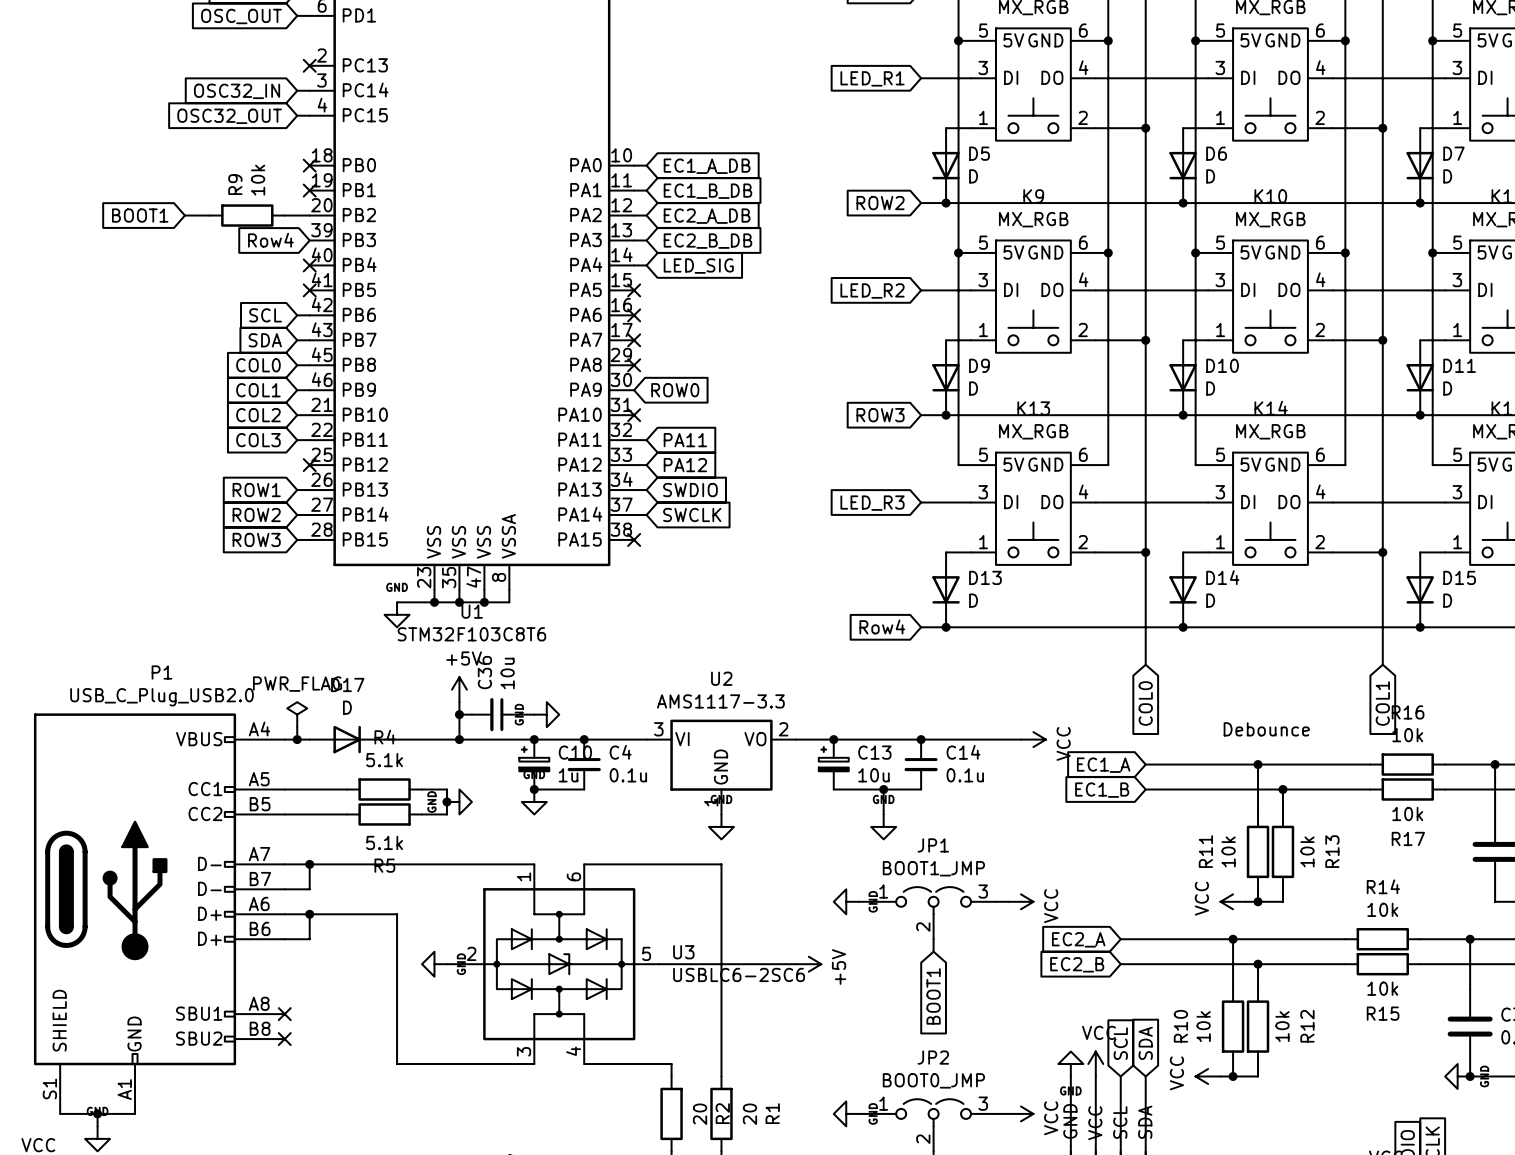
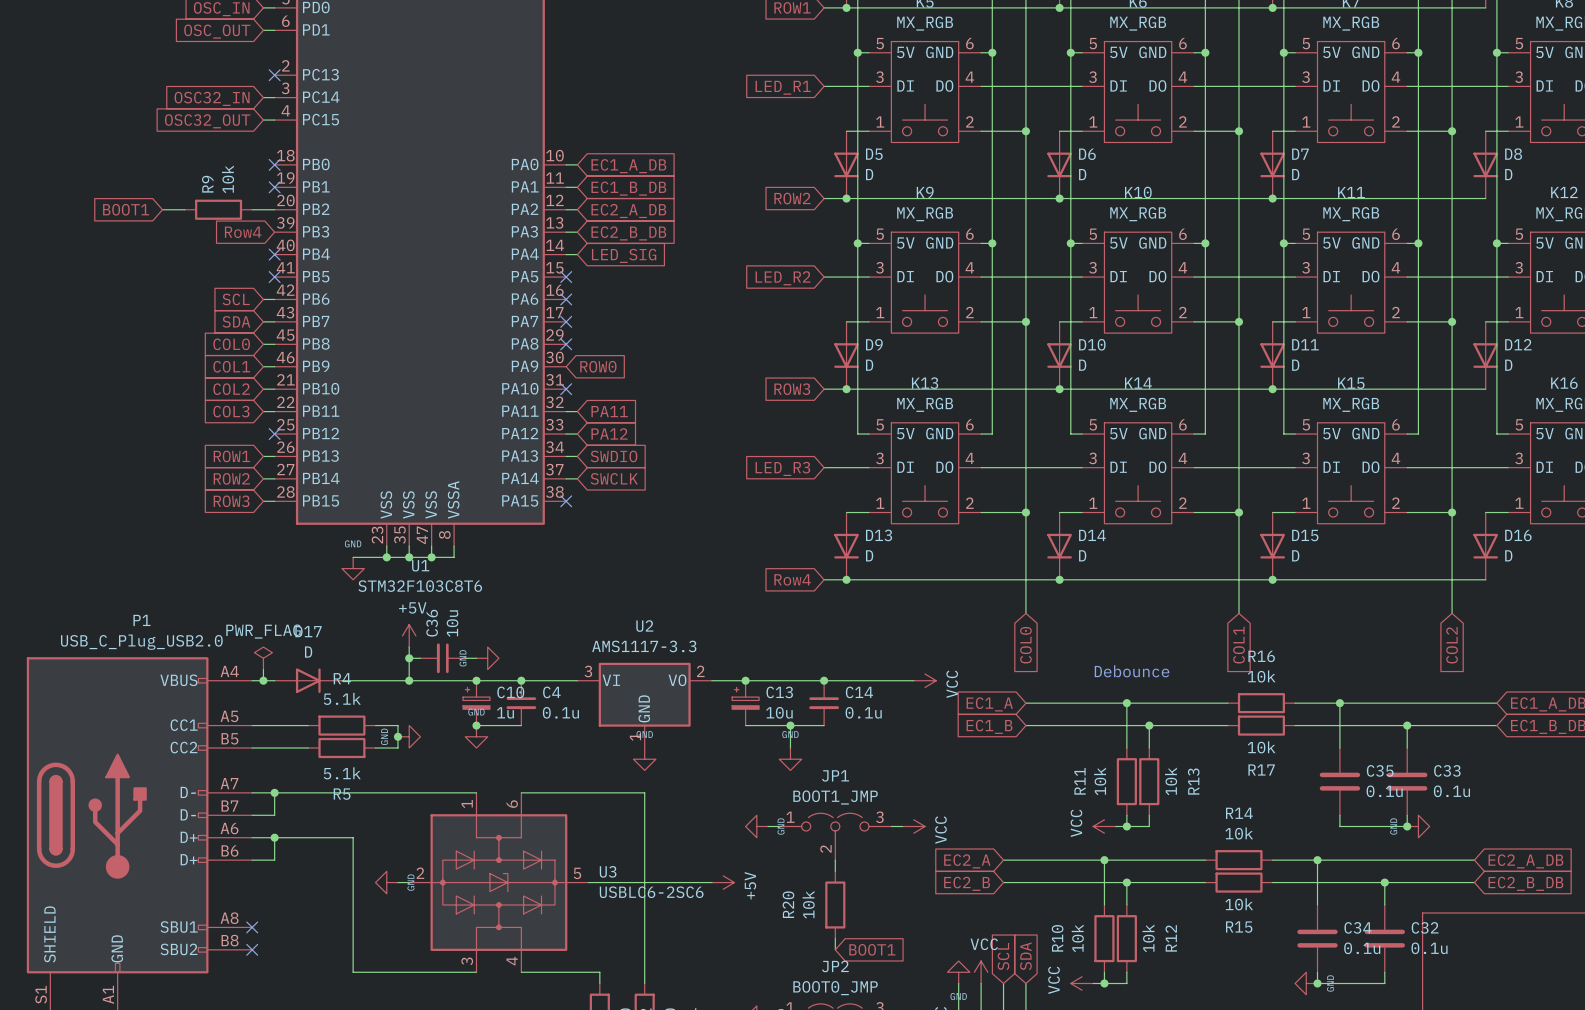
R20: none -> 10k (835, 904)
global label rotation: 0° (933, 996) -> 90° counterclockwise (872, 949)
wire: none -> (835, 938) (835, 949)

